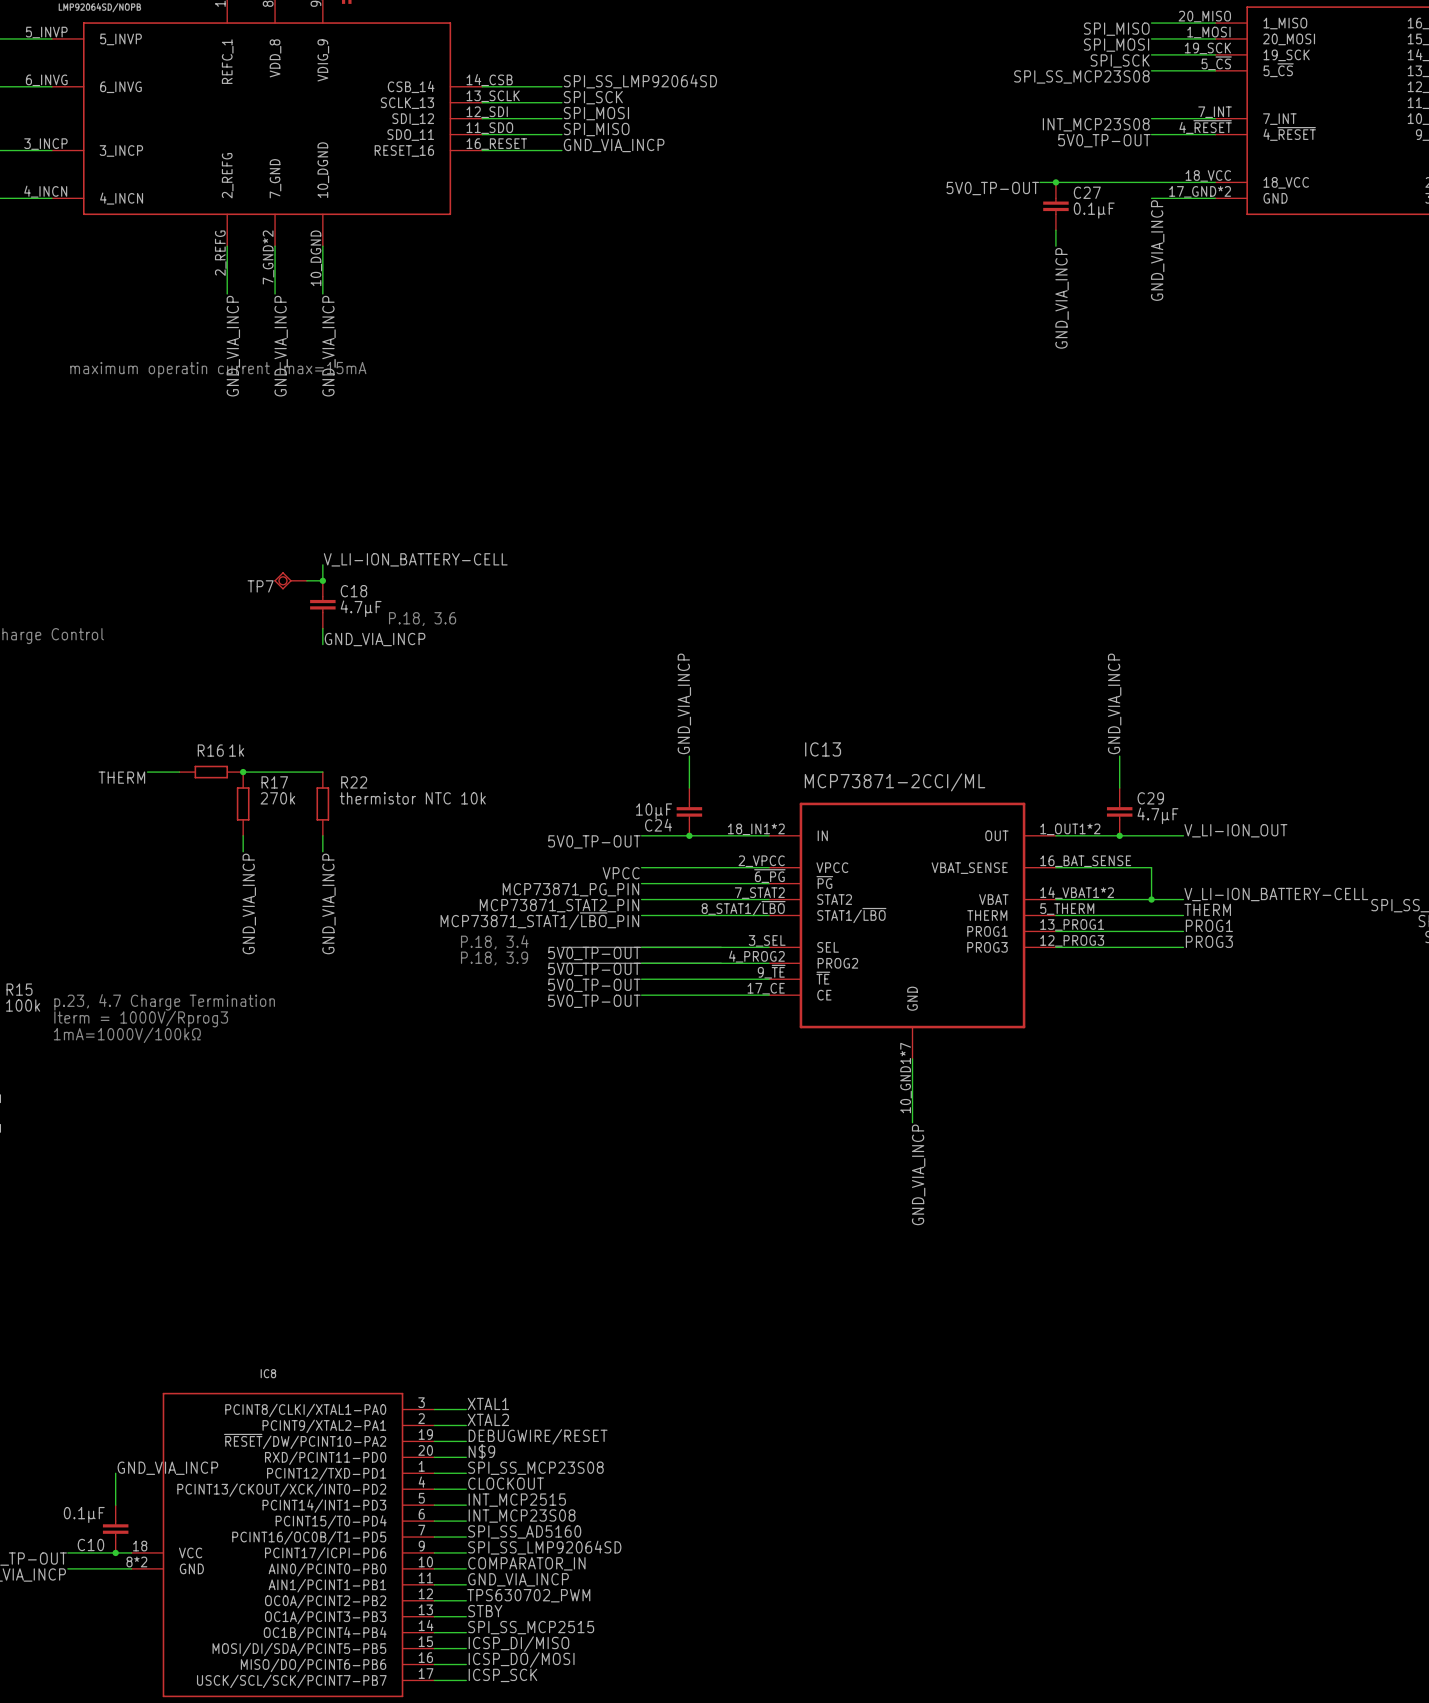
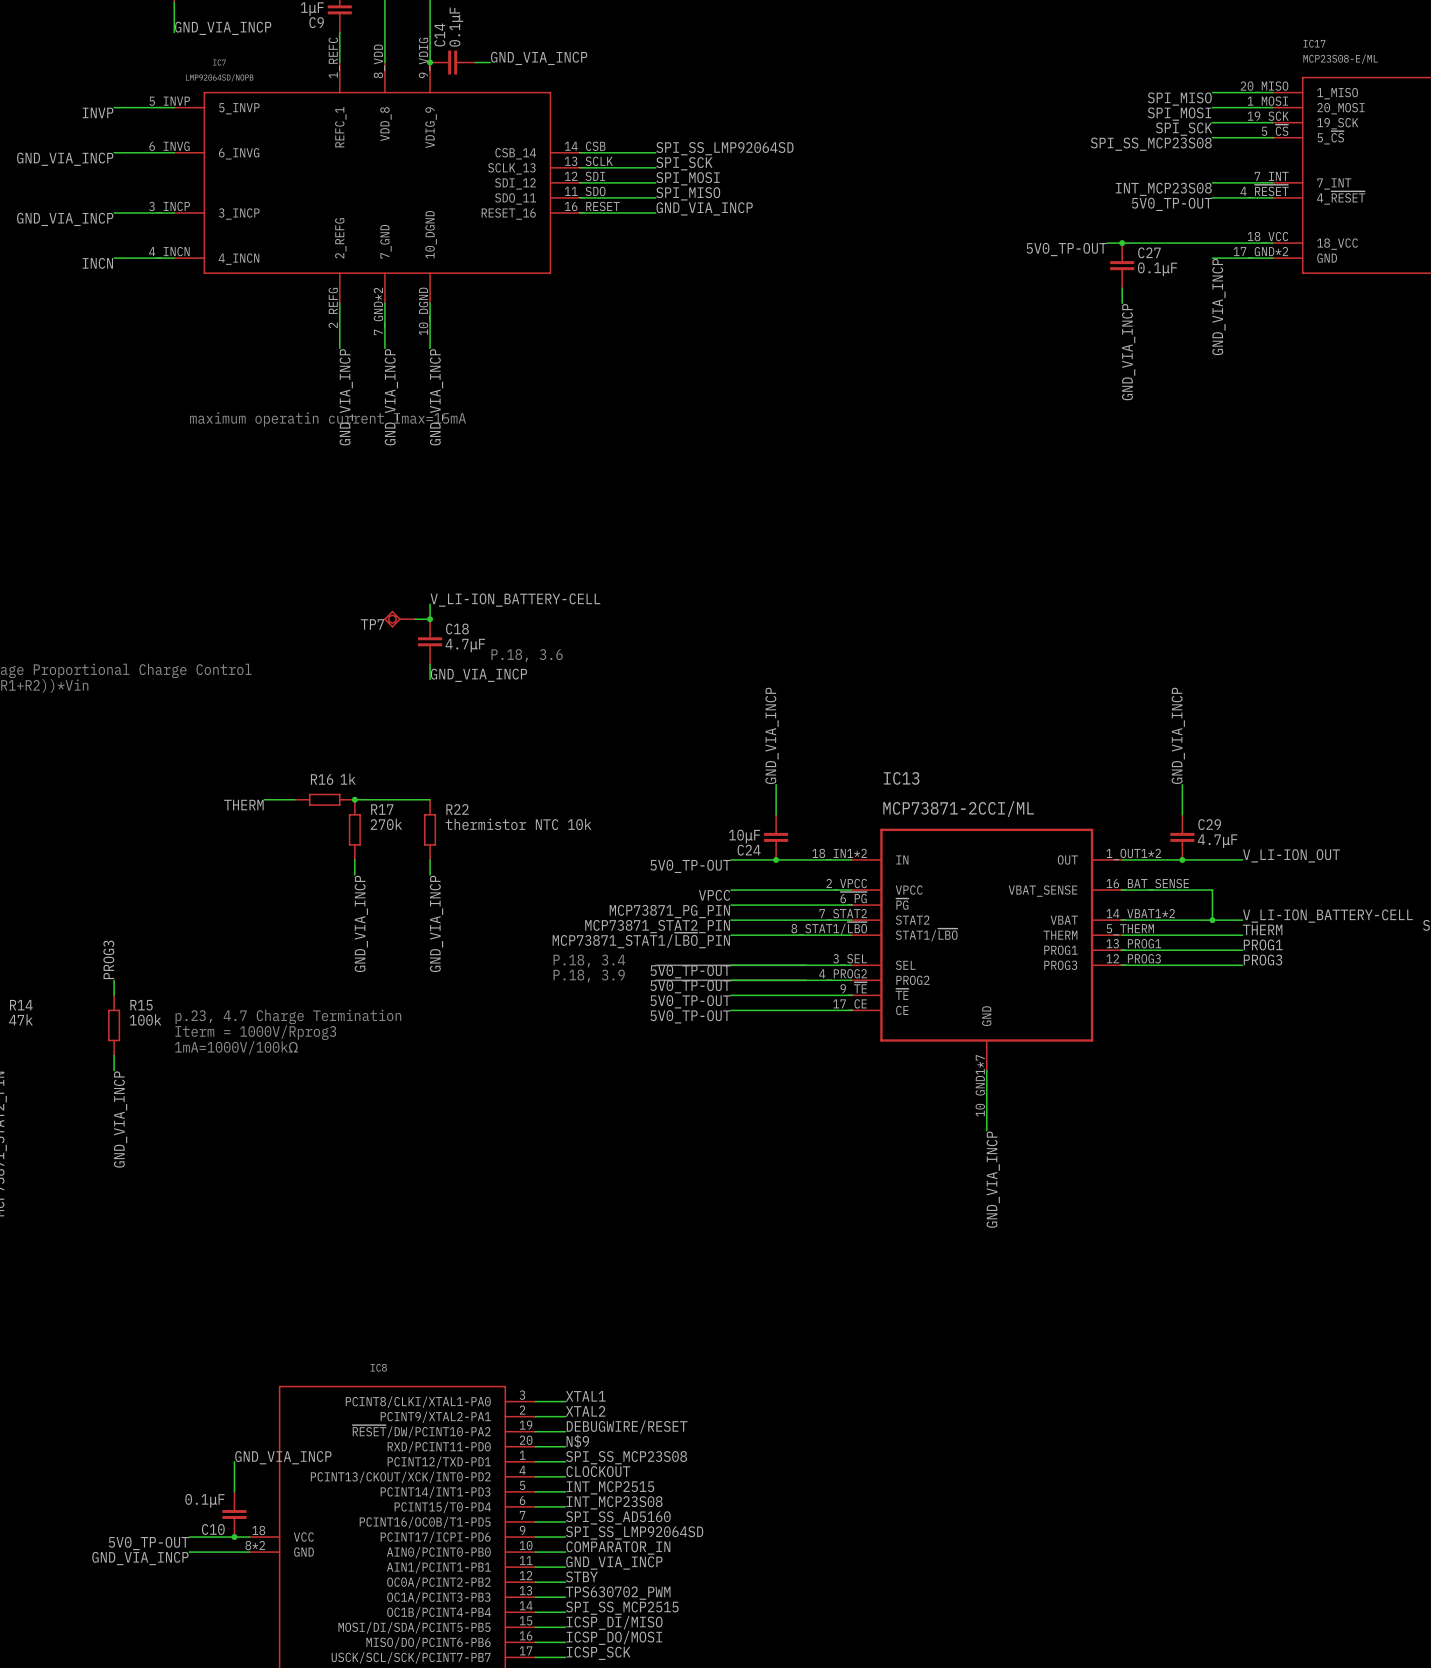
label: TPS630702_PWM (528, 1595) -> STBY (581, 1576)
label: STBY (485, 1611) -> TPS630702_PWM (618, 1593)

